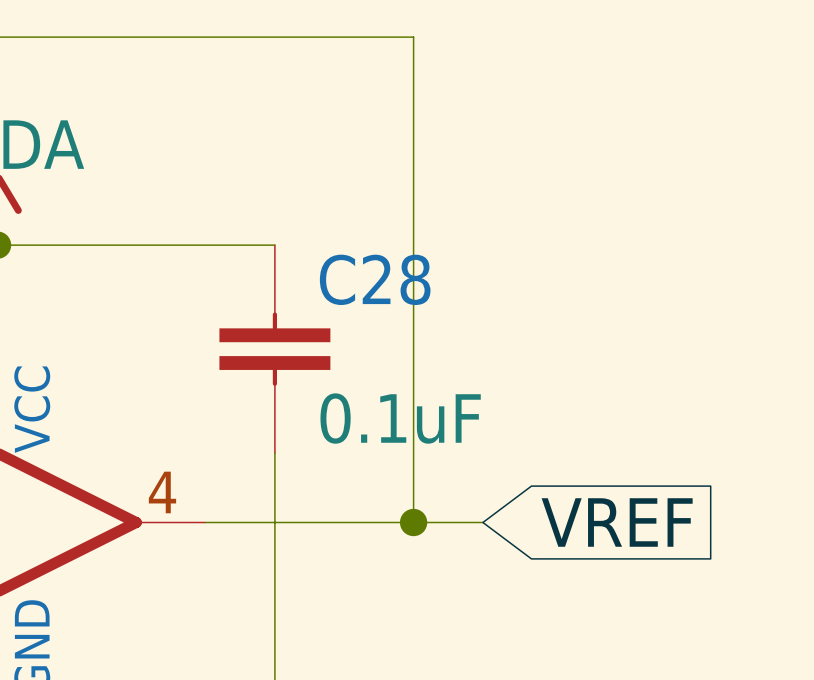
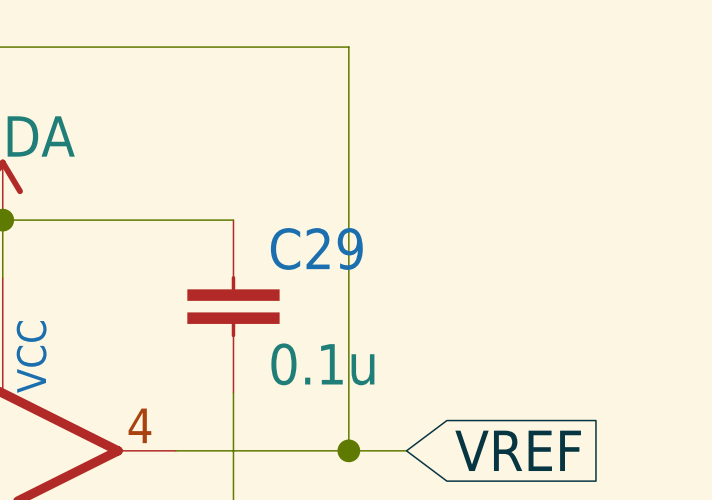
C28 name: C28 (375, 279) -> C29 (316, 248)
C28 value: 0.1uF (400, 418) -> 0.1u (322, 364)

